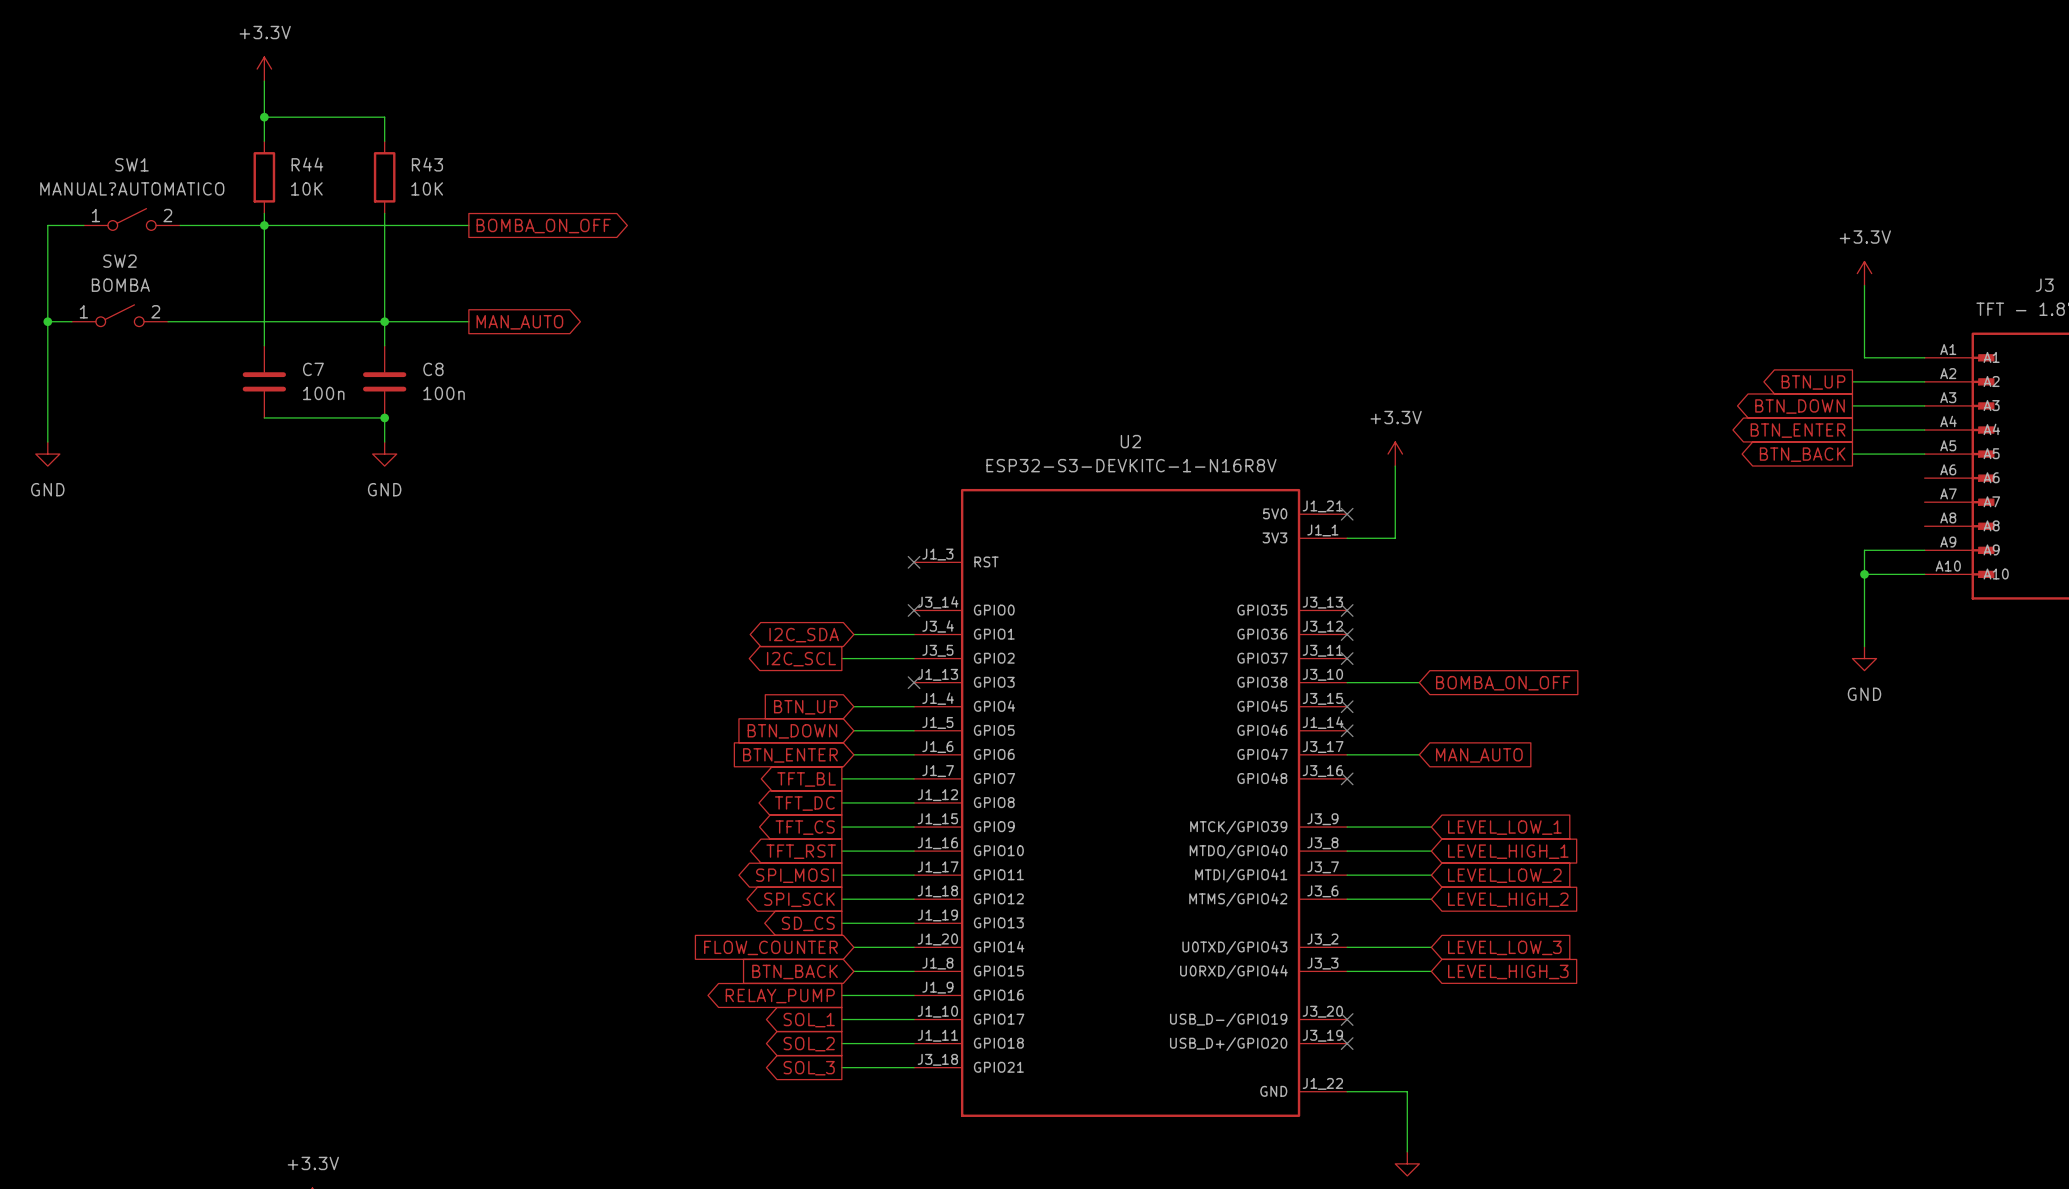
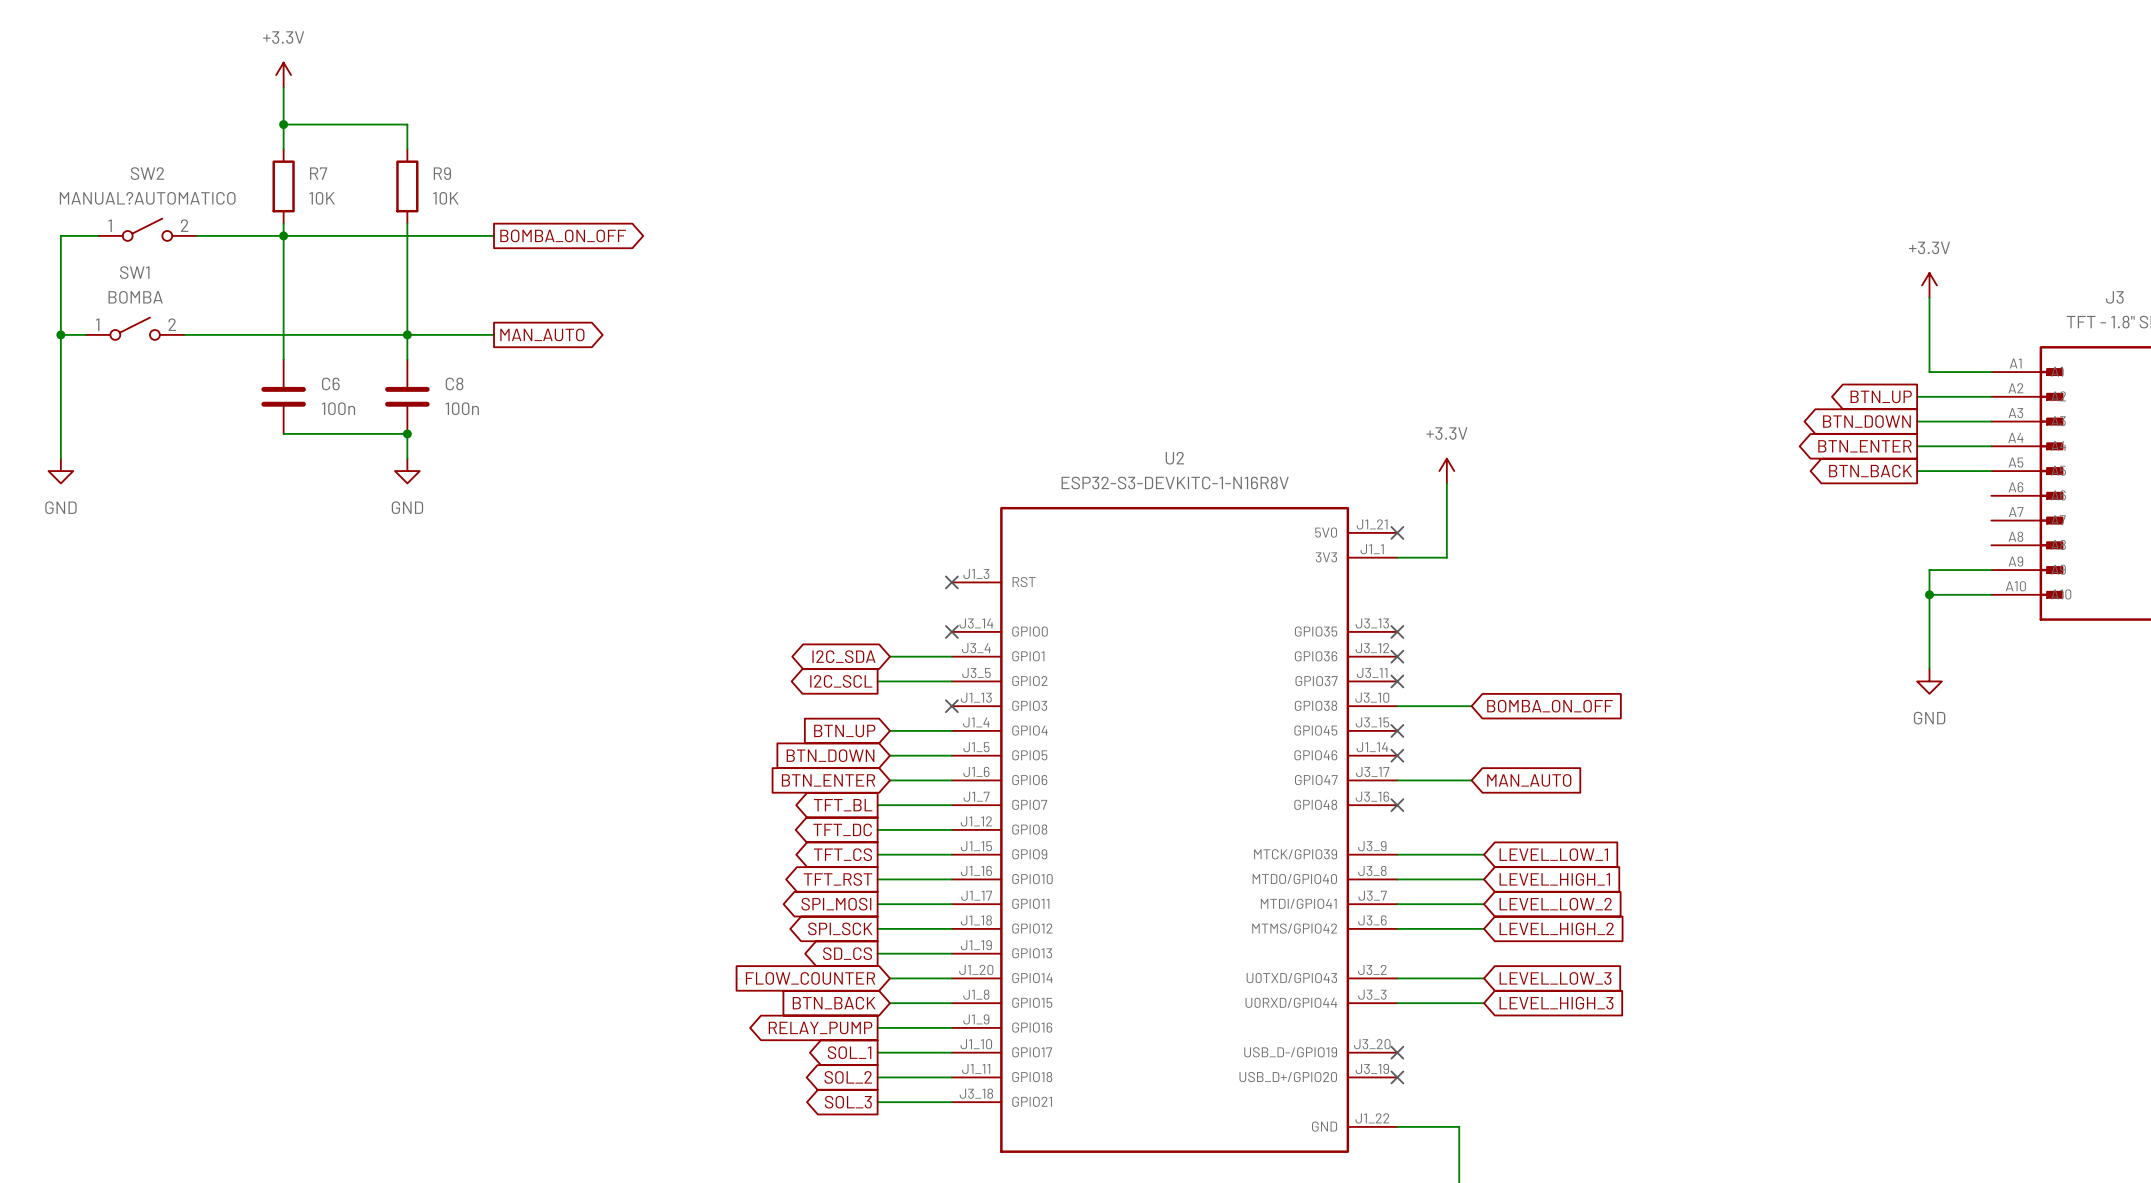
SW1 name: SW1 (132, 164) -> SW2 (147, 173)
R44 name: R44 (307, 164) -> R7 (318, 173)
R43 name: R43 (427, 164) -> R9 (442, 173)
SW2 name: SW2 (119, 261) -> SW1 (134, 272)
C7 name: C7 (313, 369) -> C6 (330, 383)

